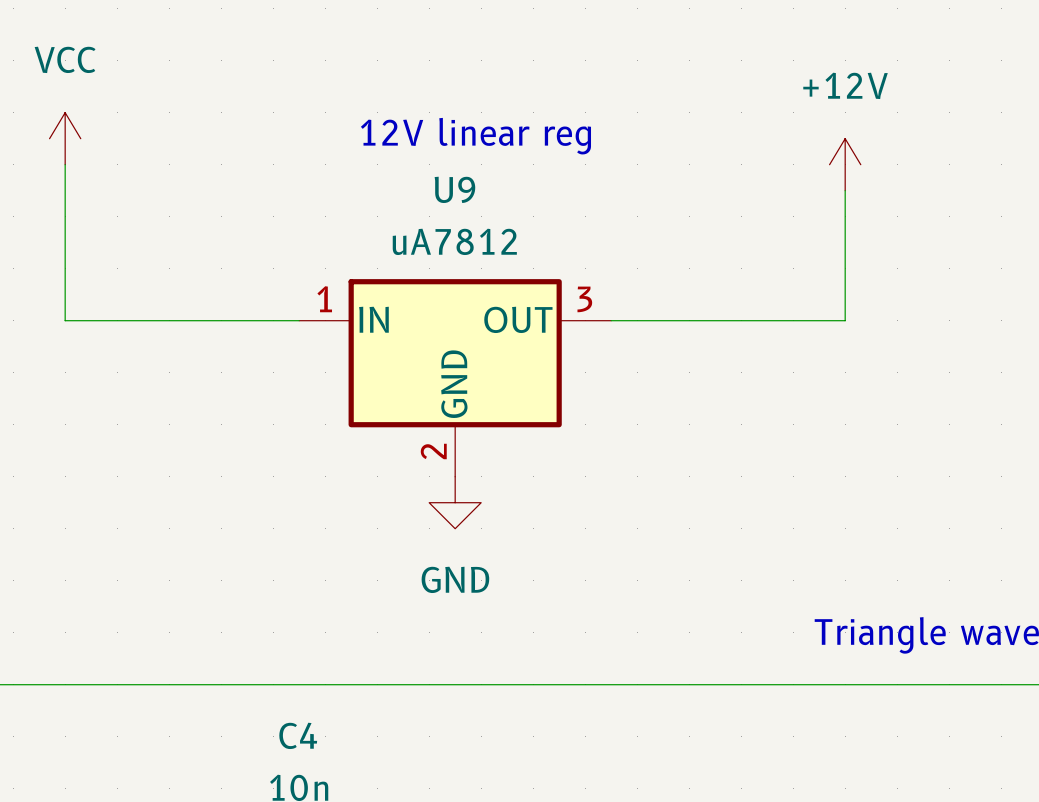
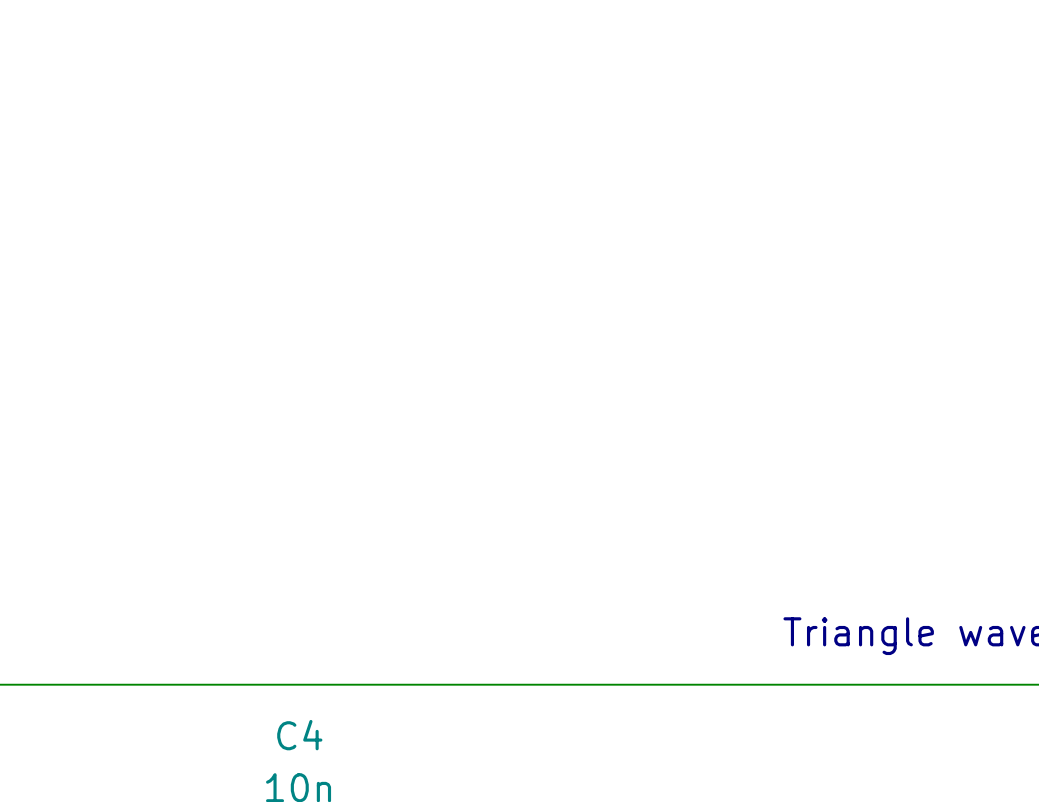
text: 12V linear reg (475, 136) -> none
power symbol: VCC (65, 138) -> none
wire: (65, 164) (65, 320) (299, 320) -> none
power symbol: +12V (845, 164) -> none
wire: (845, 190) (845, 320) (611, 320) -> none
U9: uA7812 (455, 377) -> none
power symbol: GND (455, 502) -> none

